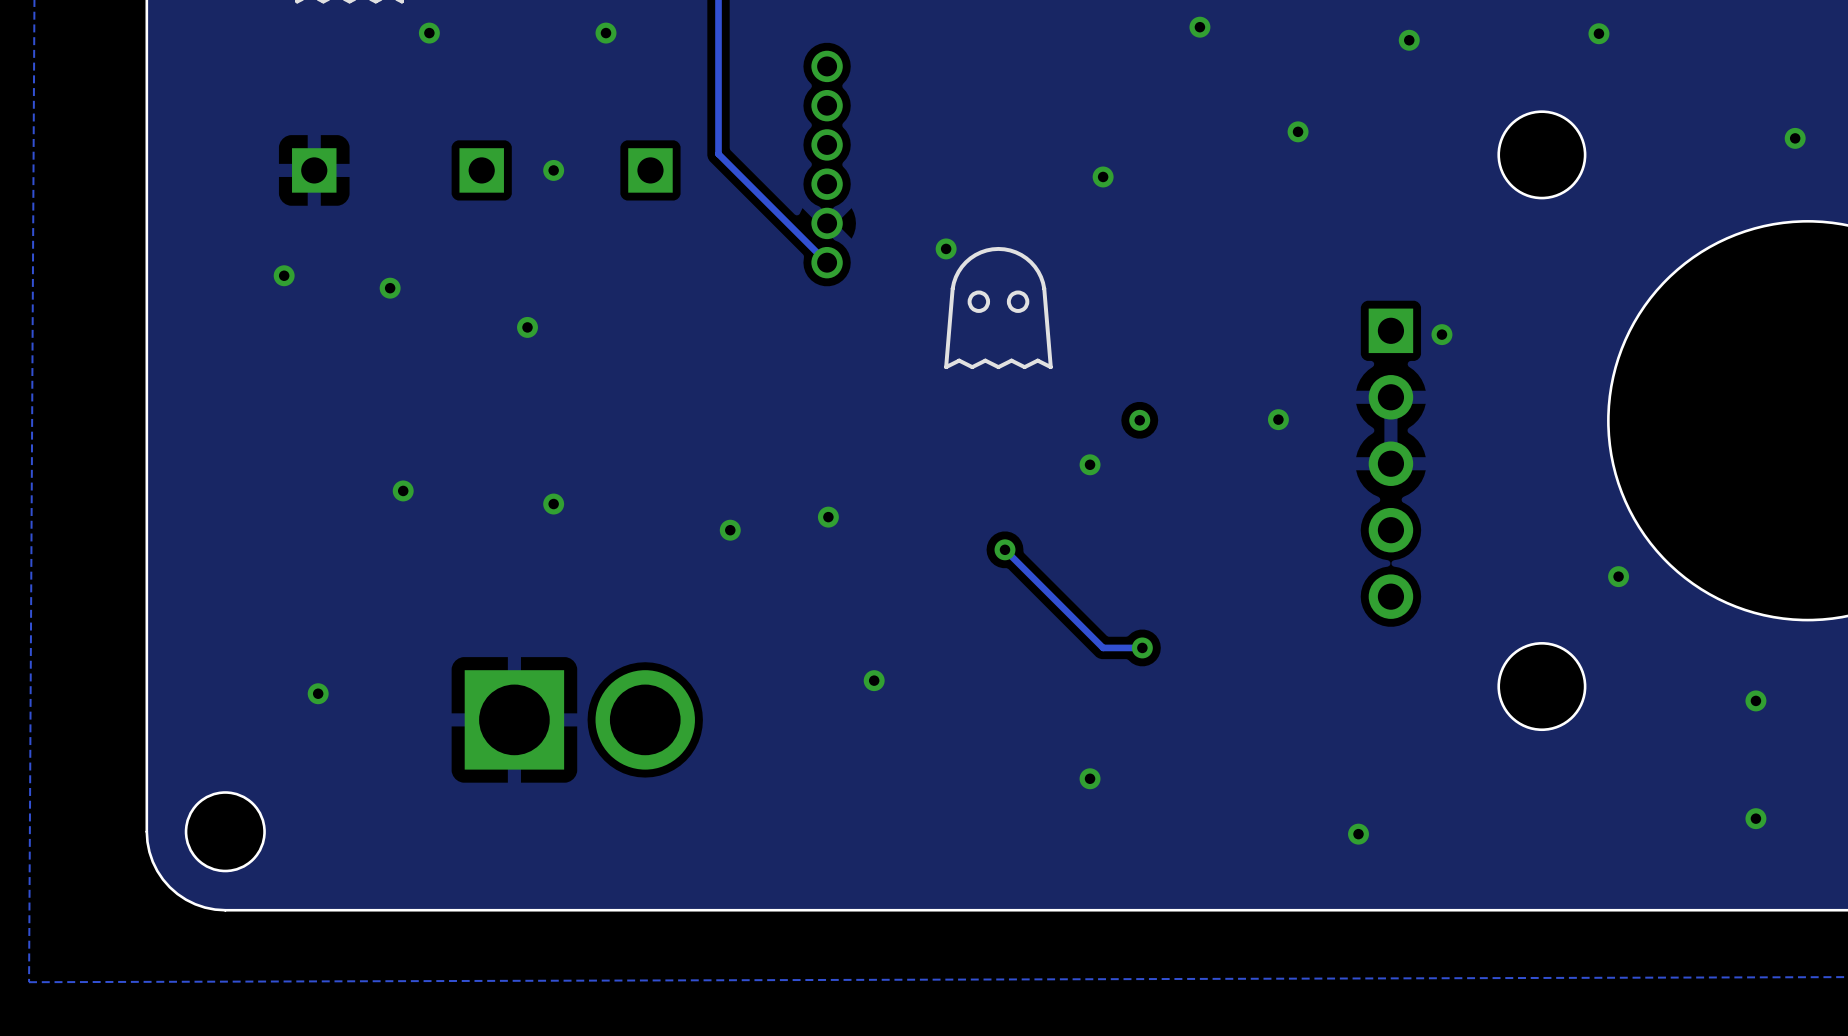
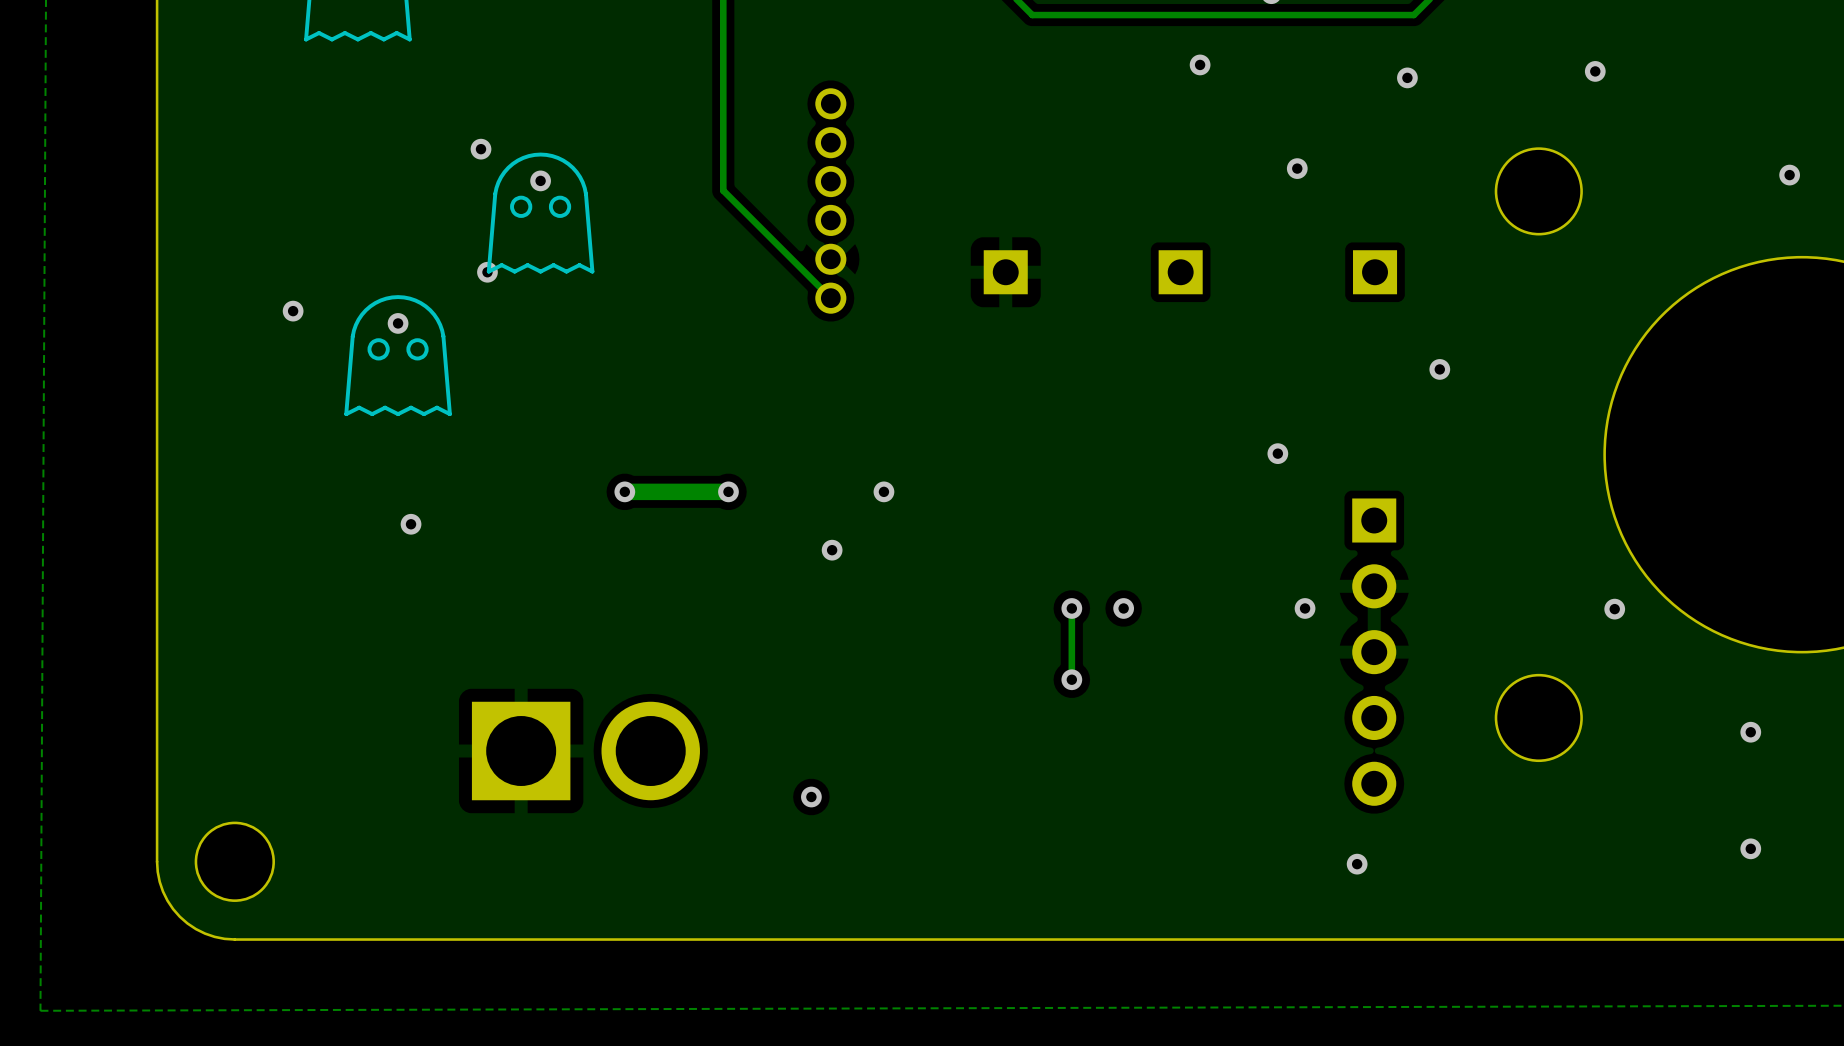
via: (429, 33) -> none
via: (605, 33) -> none
via: none -> (481, 149)
drawing: none -> [510, 195, 572, 218]
part: (314, 170) -> none
part: (481, 170) -> none
via position: (553, 170) -> (540, 180)
part: (650, 170) -> none
via: (1103, 176) -> none
via: none -> (487, 272)
part: none -> (1005, 272)
part: none -> (1180, 272)
part: none -> (1375, 272)
via: (946, 248) -> none
line: (1044, 288) (1050, 367) (1037, 360) (1024, 367) (1011, 360) (998, 367) (985, 360) (972, 367) (959, 360) (946, 367) (953, 282) (958, 271) (970, 258) (980, 252) (992, 249) (1004, 249) (1016, 252) (1026, 258) (1034, 266) (1041, 277) (1044, 288) -> (585, 193) (592, 271) (579, 265) (566, 271) (553, 265) (540, 271) (527, 265) (514, 271) (501, 265) (488, 271) (496, 188) (501, 177) (512, 163) (523, 157) (534, 154) (546, 154) (558, 157) (568, 163) (576, 172) (582, 182) (585, 193)
drawing: [967, 290, 1030, 313] -> none
line: none -> (443, 336) (449, 414) (436, 407) (423, 414) (411, 407) (398, 414) (385, 407) (372, 414) (359, 407) (346, 414) (353, 330) (361, 314) (370, 306) (380, 300) (392, 297) (404, 297) (415, 300) (425, 306) (434, 314) (440, 324) (443, 336)
drawing: none -> [367, 338, 429, 361]
via: (527, 327) -> none
via: (1139, 420) -> none
via: none -> (624, 491)
track: none -> (728, 491) (624, 491)
via: none -> (728, 491)
via: none -> (883, 491)
part position: (1390, 463) -> (1374, 652)
via: (1090, 464) -> none
via: (553, 504) -> none
via: (730, 530) -> none
track: (1005, 549) (1103, 647) (1142, 647) -> none
via: (1005, 549) -> none
track: none -> (1071, 608) (1071, 679)
via: none -> (1071, 608)
via: none -> (1123, 608)
via: none -> (1305, 608)
via: none -> (1071, 679)
via: (1142, 647) -> none
via: (874, 680) -> none
via: (318, 693) -> none
via: none -> (811, 797)
via: (1090, 778) -> none

